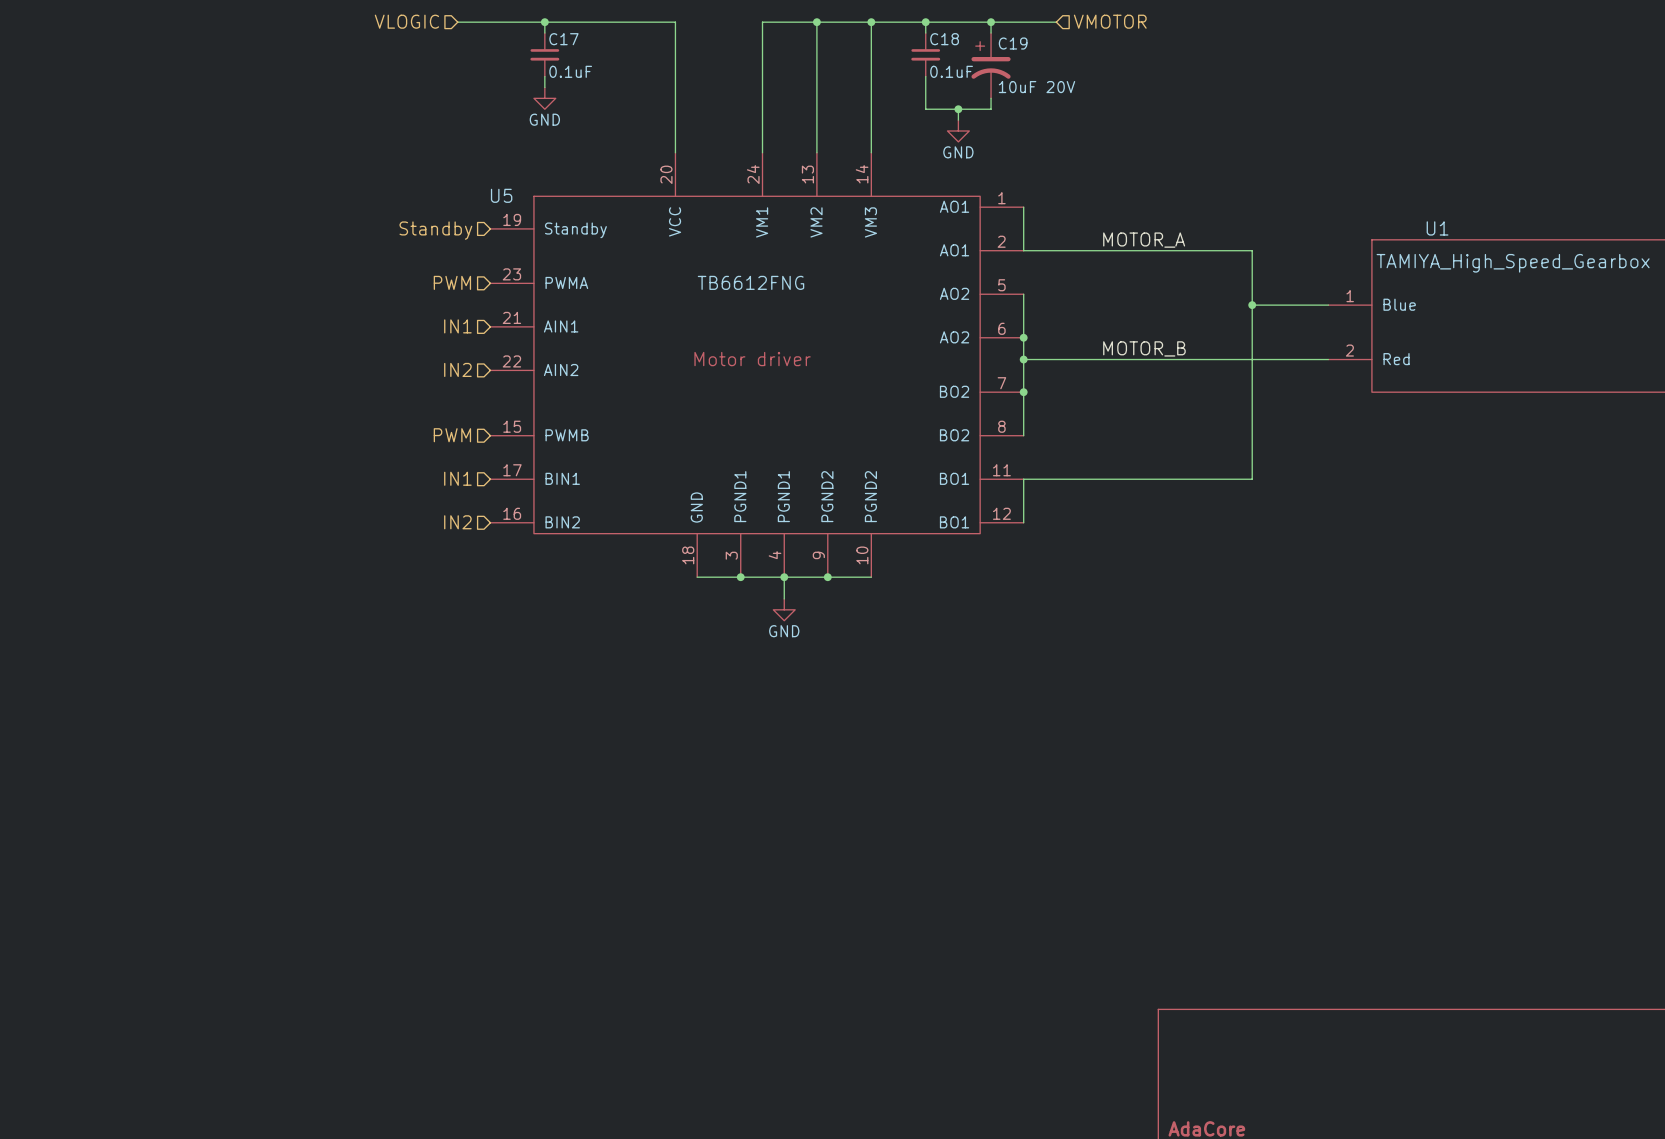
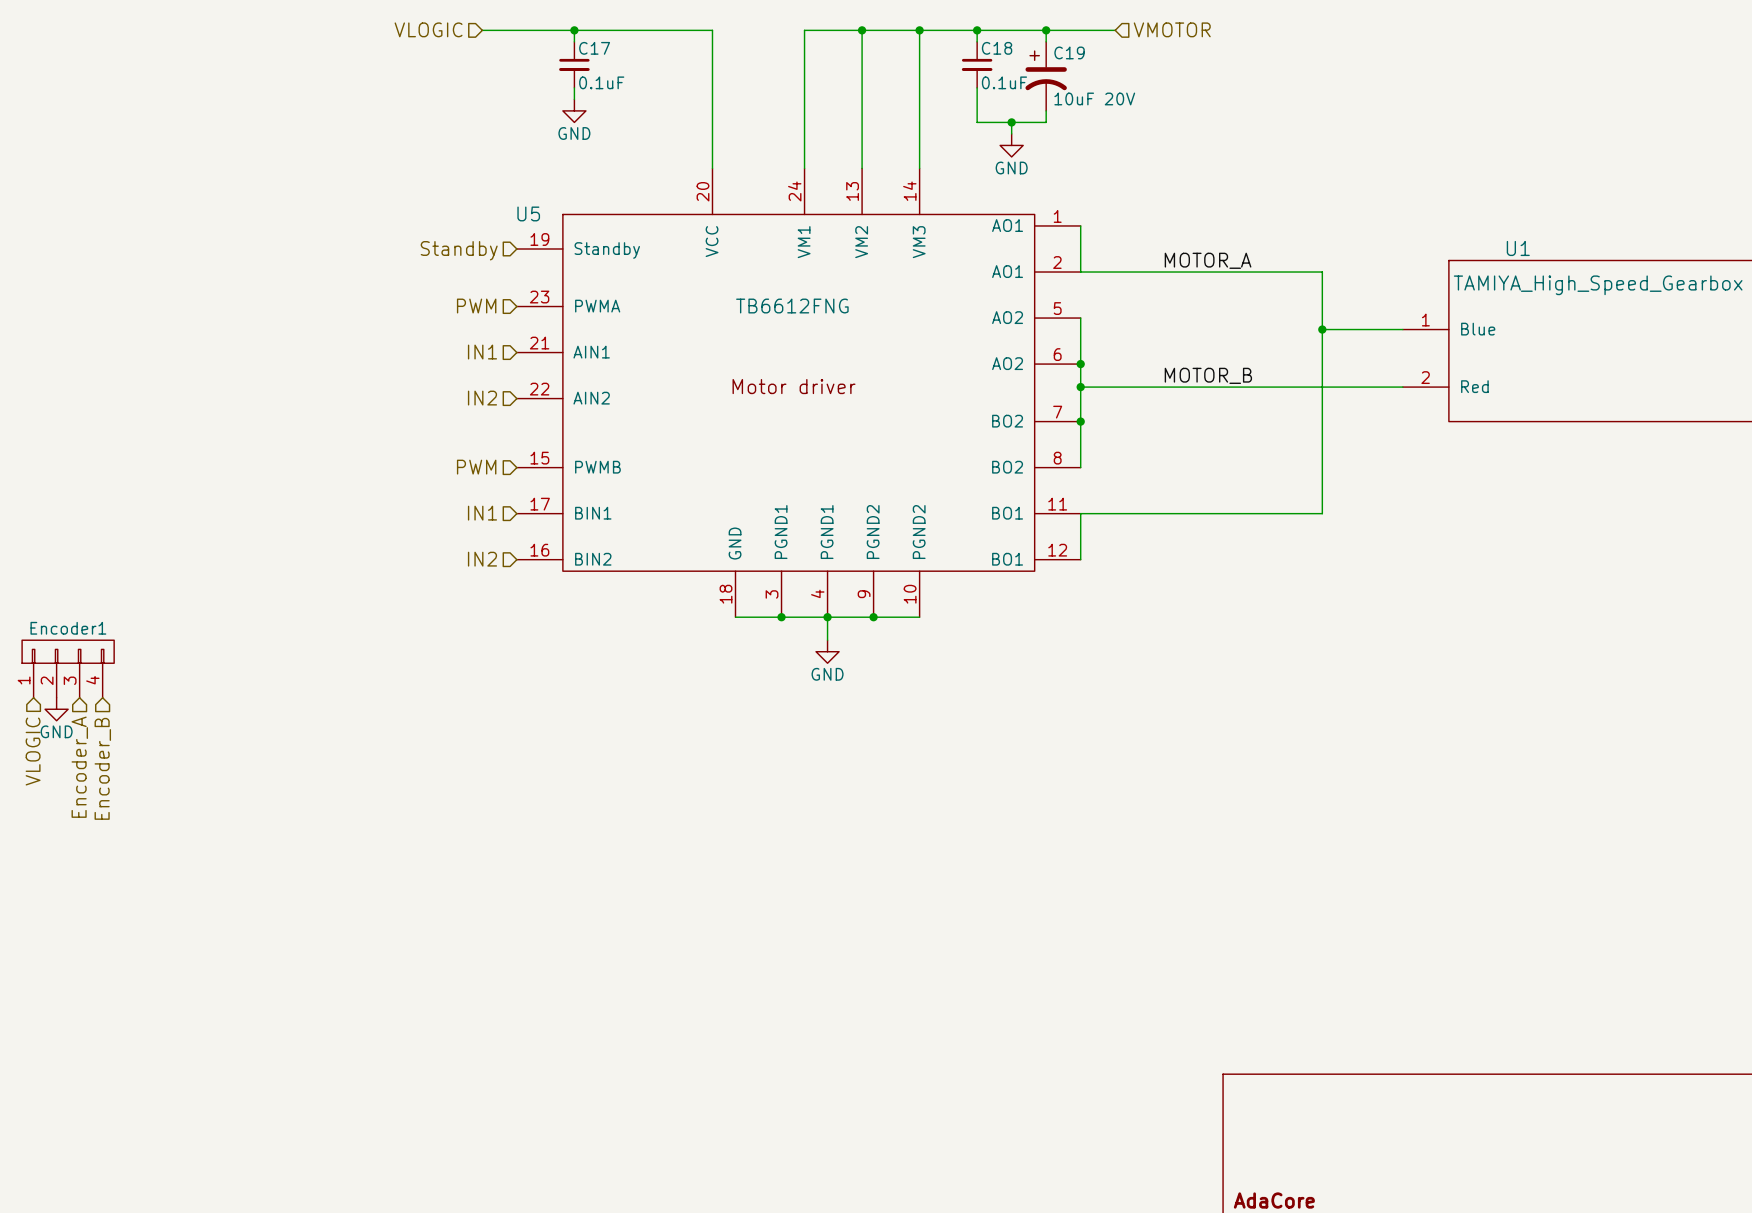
Encoder1: none -> (68, 668)
power symbol: none -> GND (56, 709)
hierarchical label: none -> VLOGIC (33, 751)
hierarchical label: none -> Encoder_A (79, 767)
hierarchical label: none -> Encoder_B (102, 768)

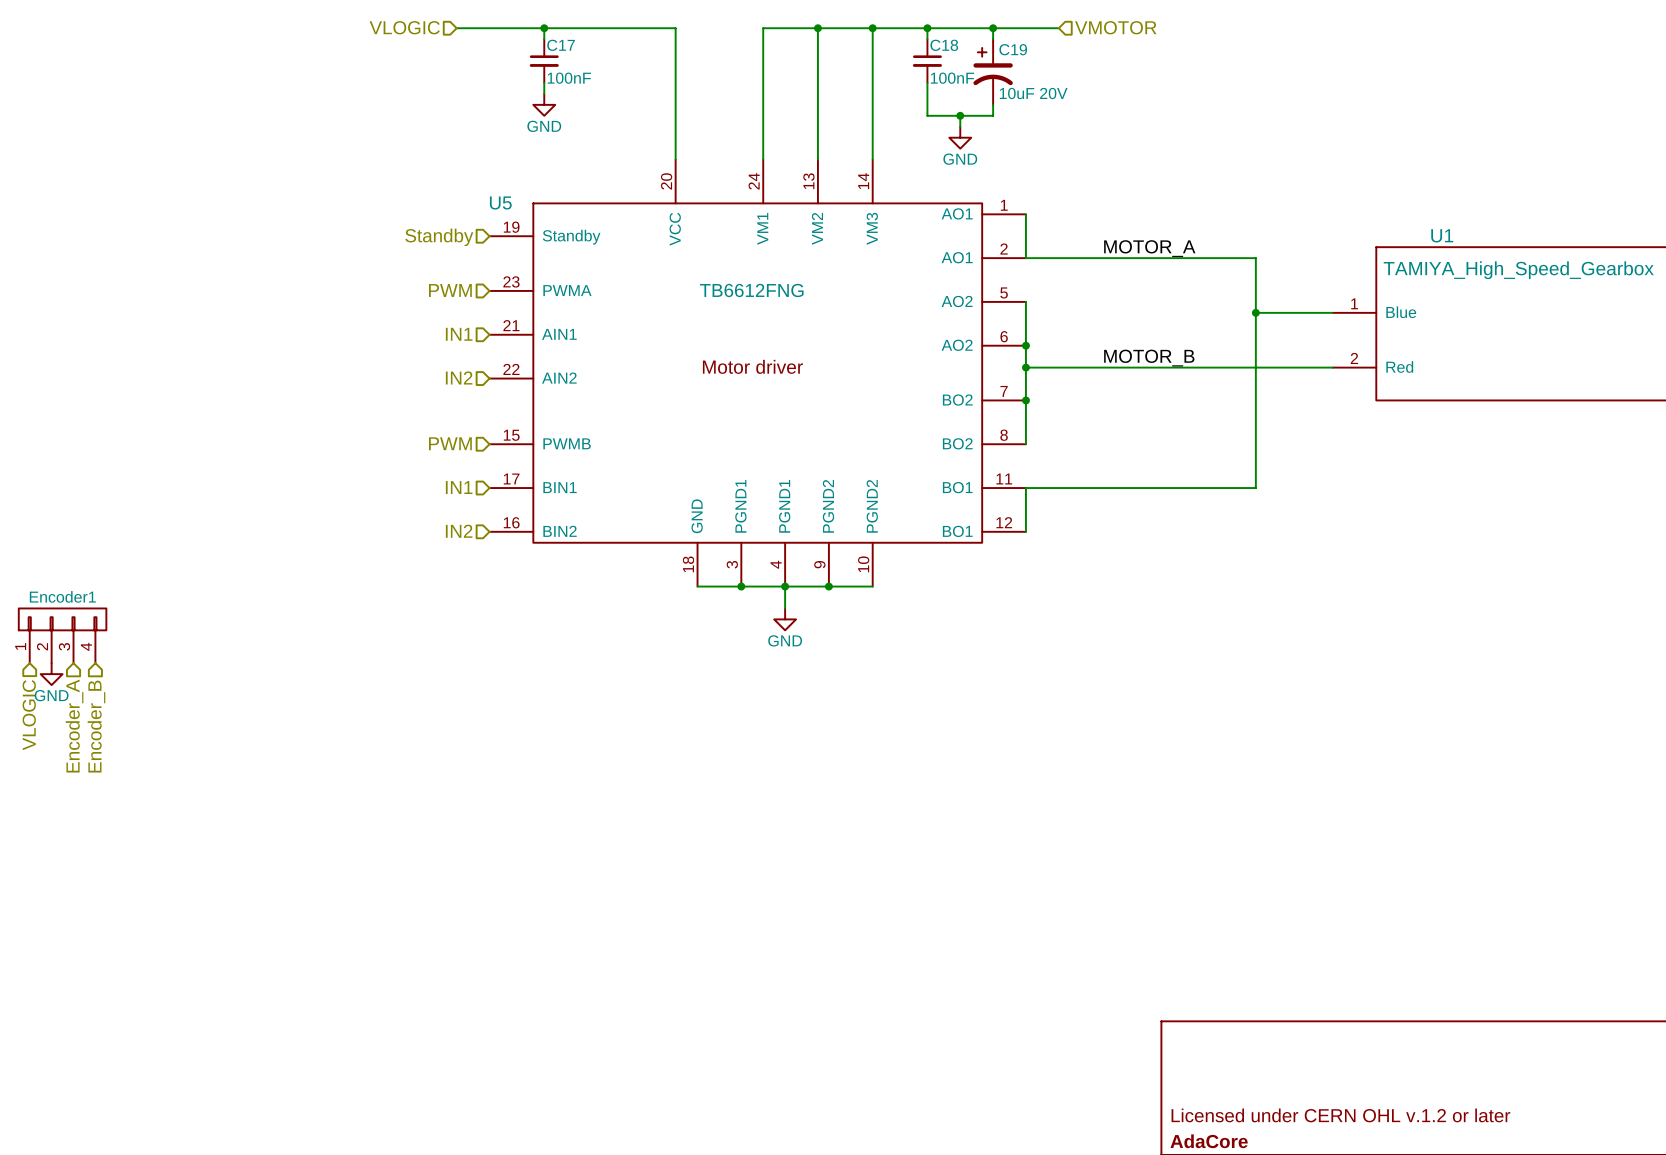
C17 value: 0.1uF (601, 82) -> 100nF (569, 78)
C18 value: 0.1uF (1004, 82) -> 100nF (952, 78)
title block: none -> Licensed under CERN OHL v.1.2 or later (1340, 1115)

